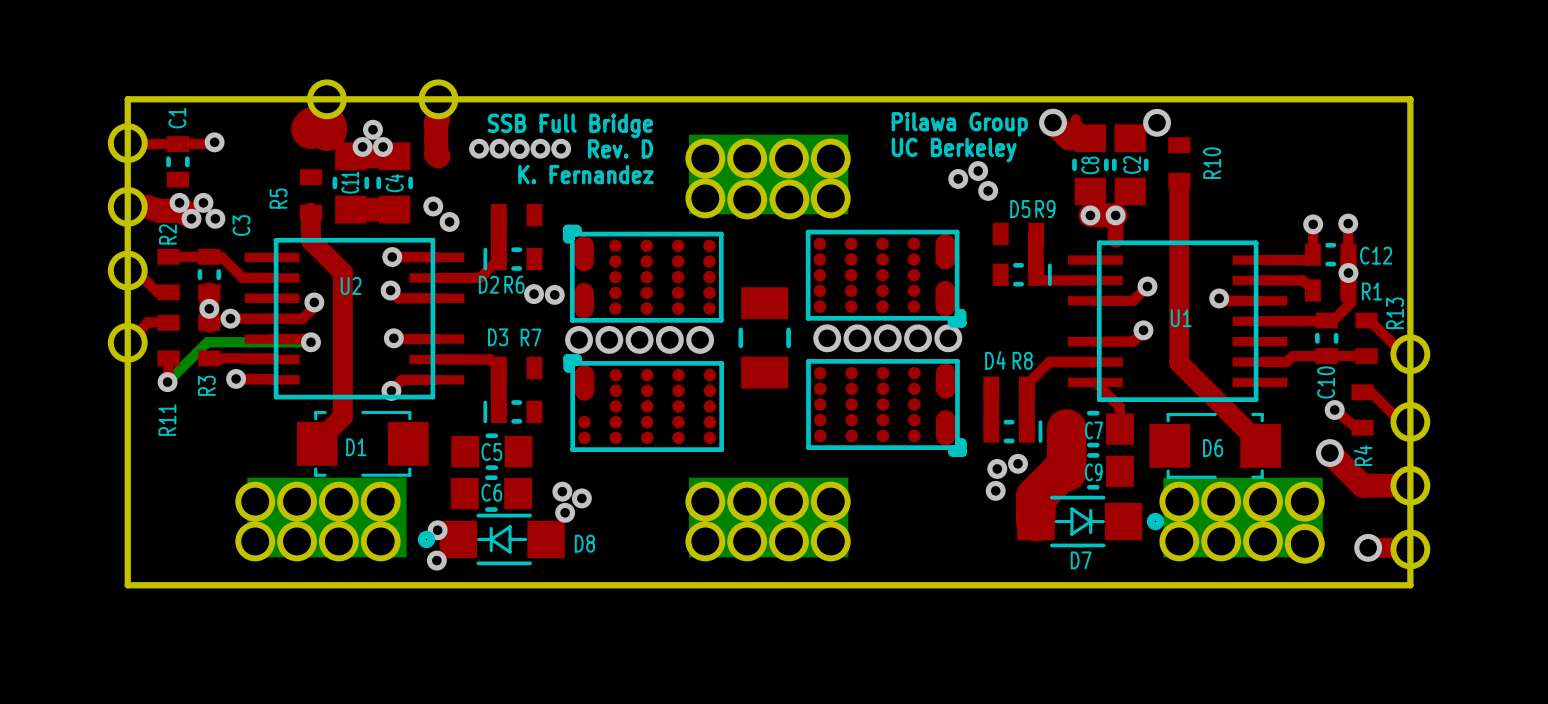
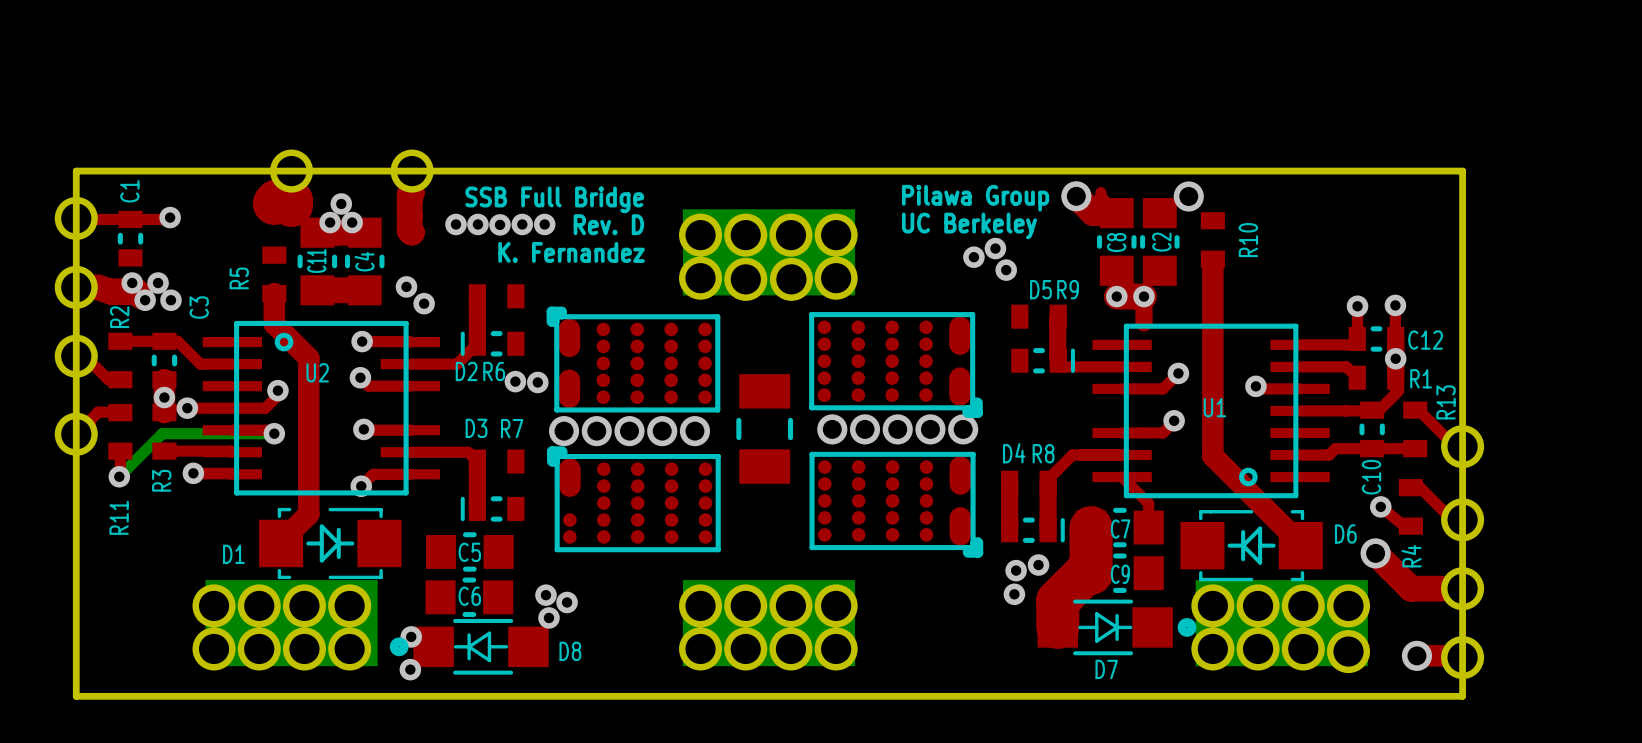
U2 footprint: [244, 237, 465, 400] -> [202, 320, 440, 496]
U1 footprint: [1067, 240, 1288, 403] -> [1092, 323, 1330, 499]
D1 footprint: [296, 410, 429, 477] -> [259, 507, 402, 580]
D6 footprint: [1149, 412, 1282, 479] -> [1180, 510, 1323, 582]
D1 name position: D1 (356, 447) -> D1 (233, 554)
D6 name position: D6 (1213, 448) -> D6 (1345, 533)

